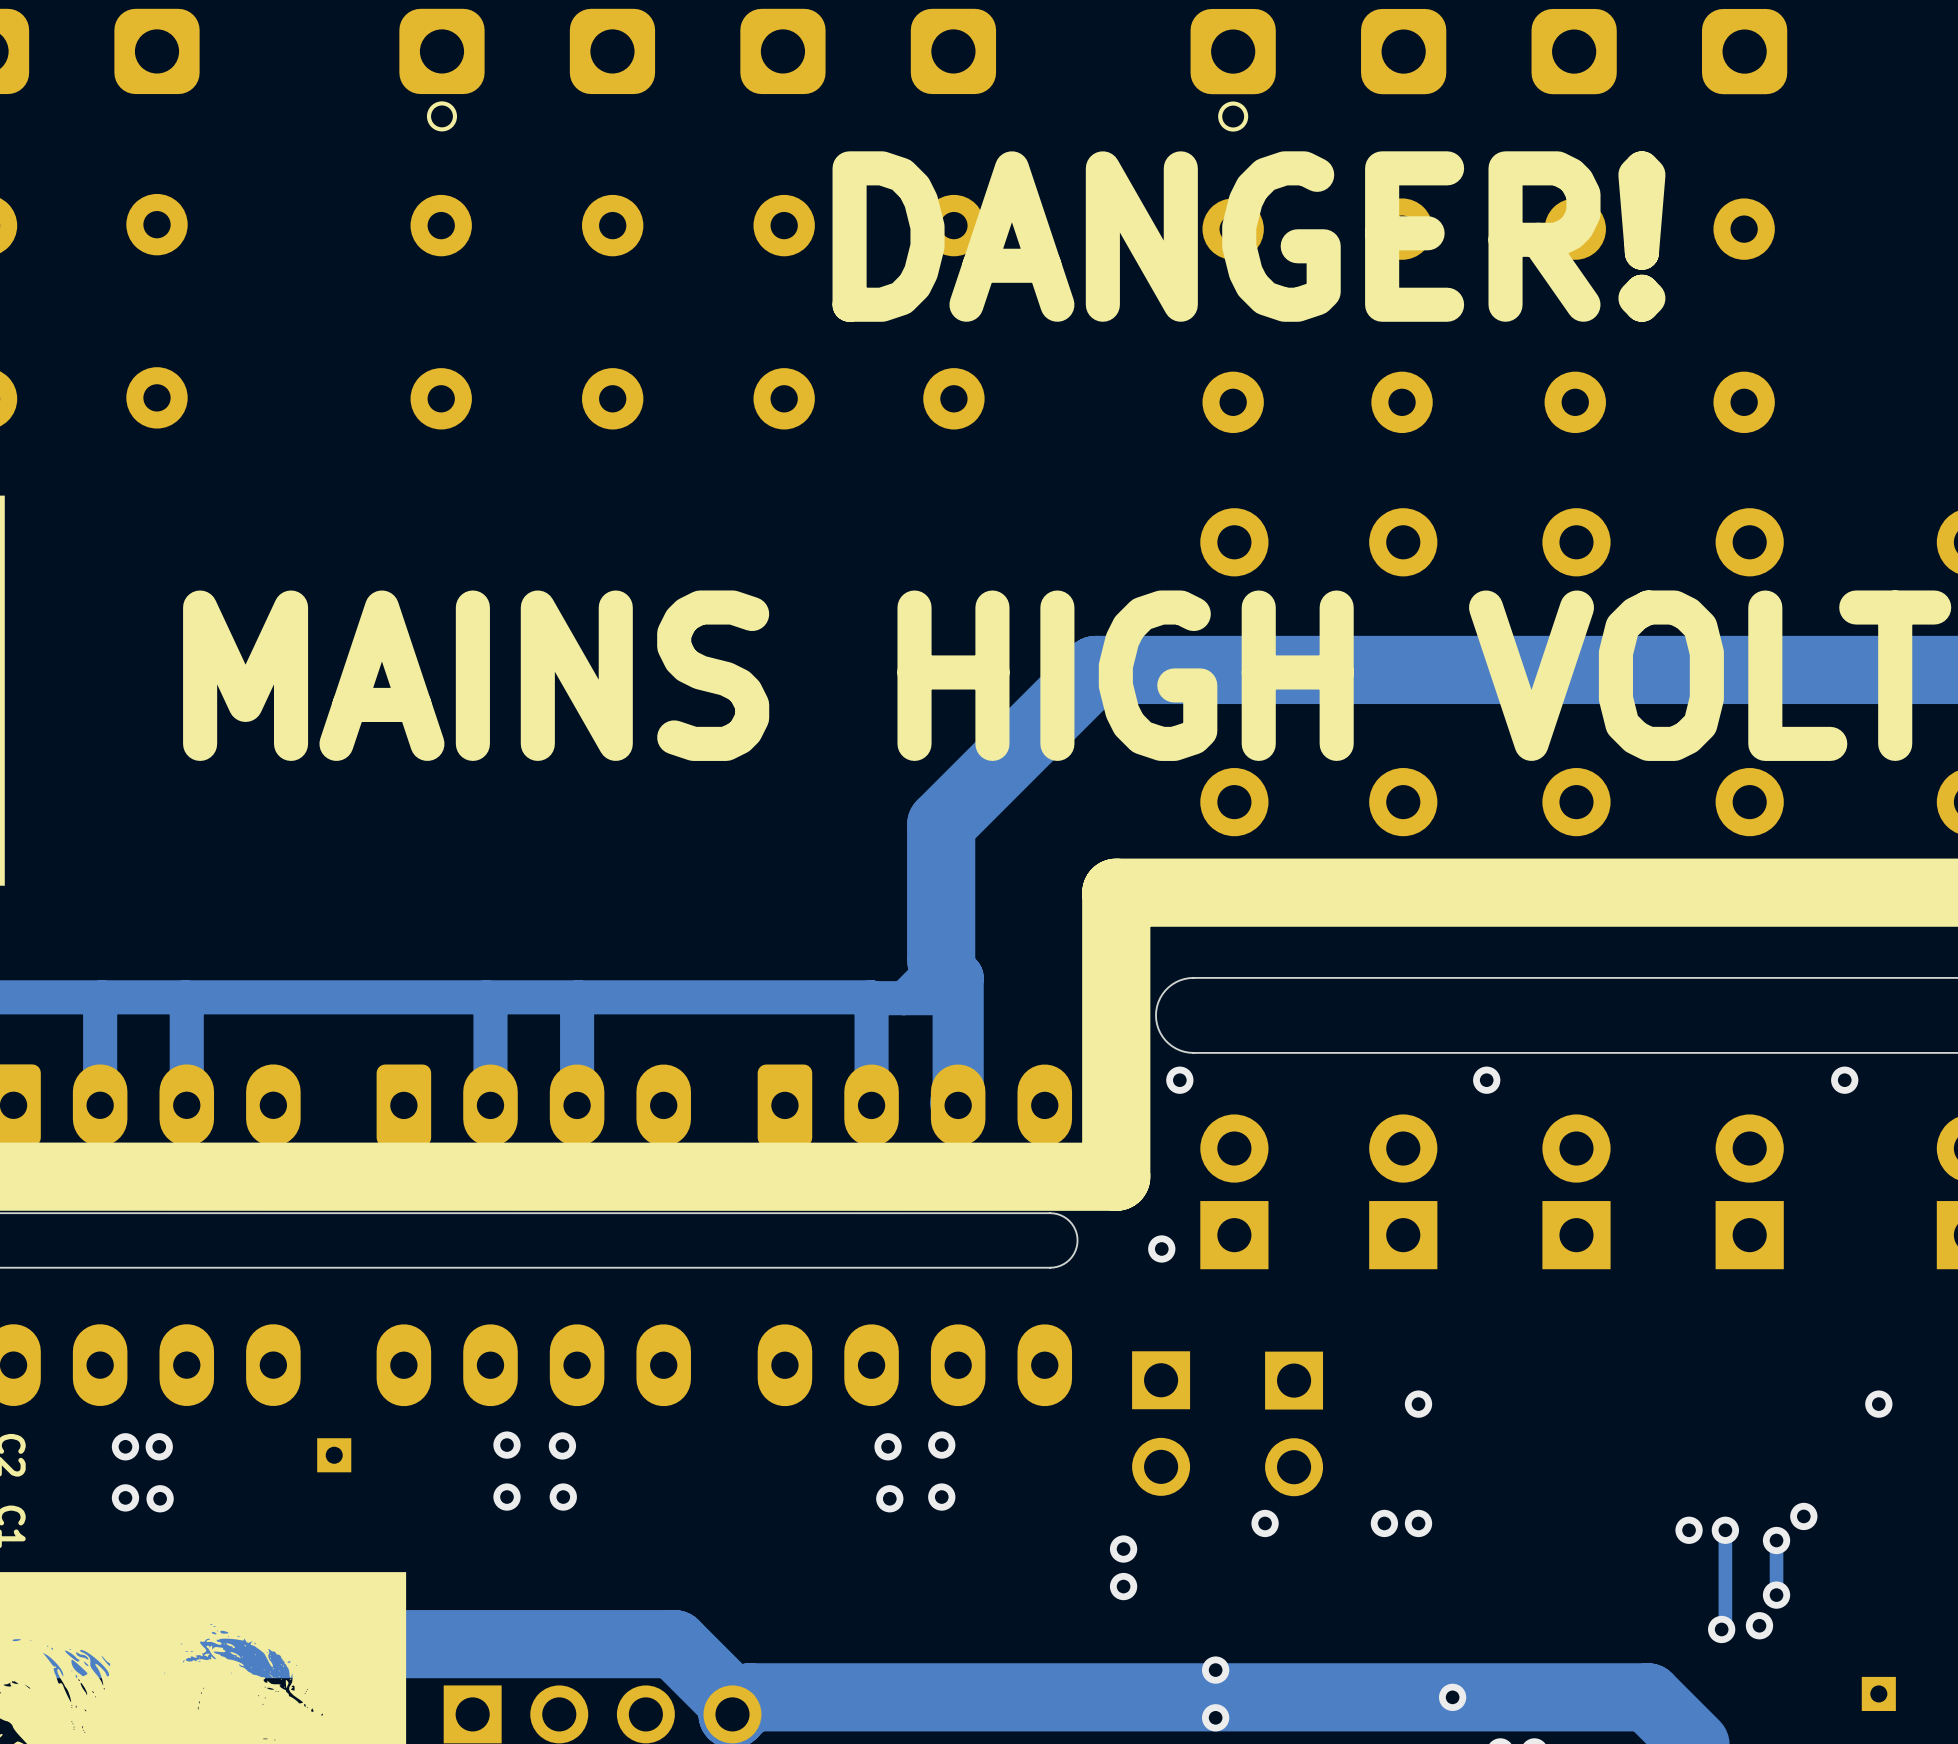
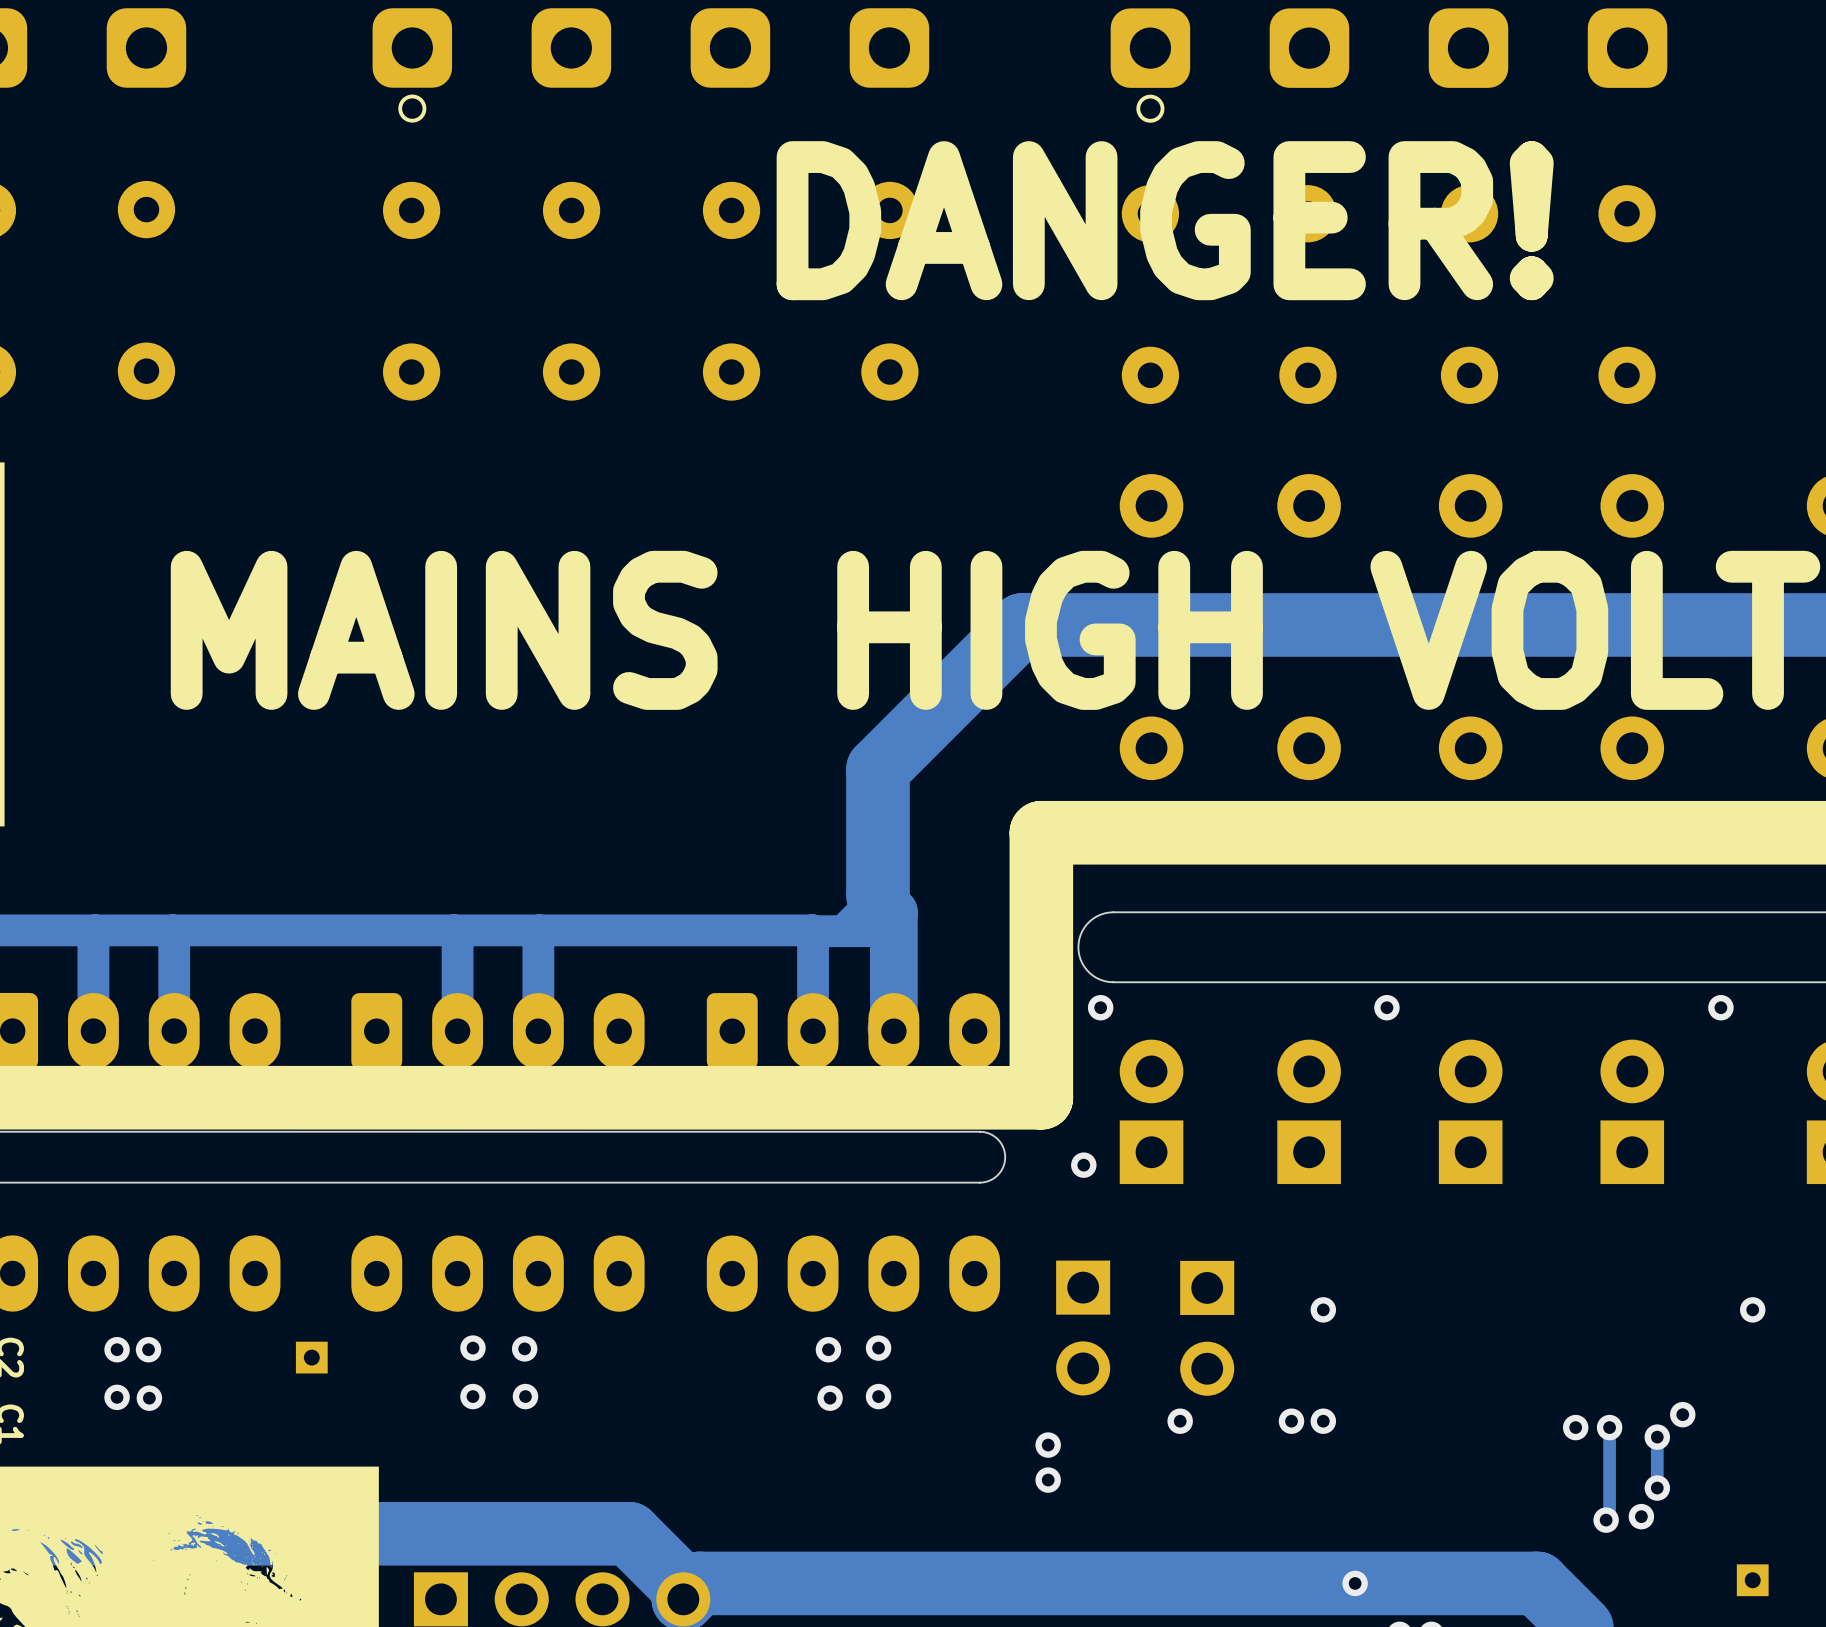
via: (1215, 1670) -> none
via: (1215, 1717) -> none

